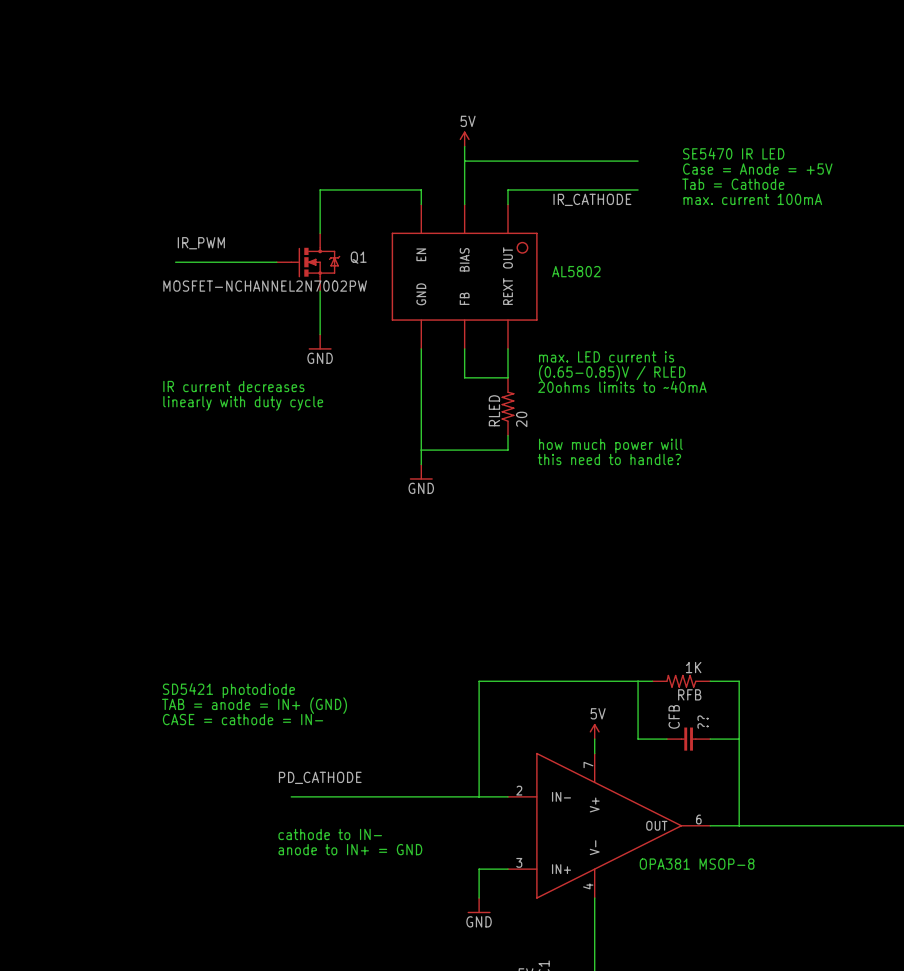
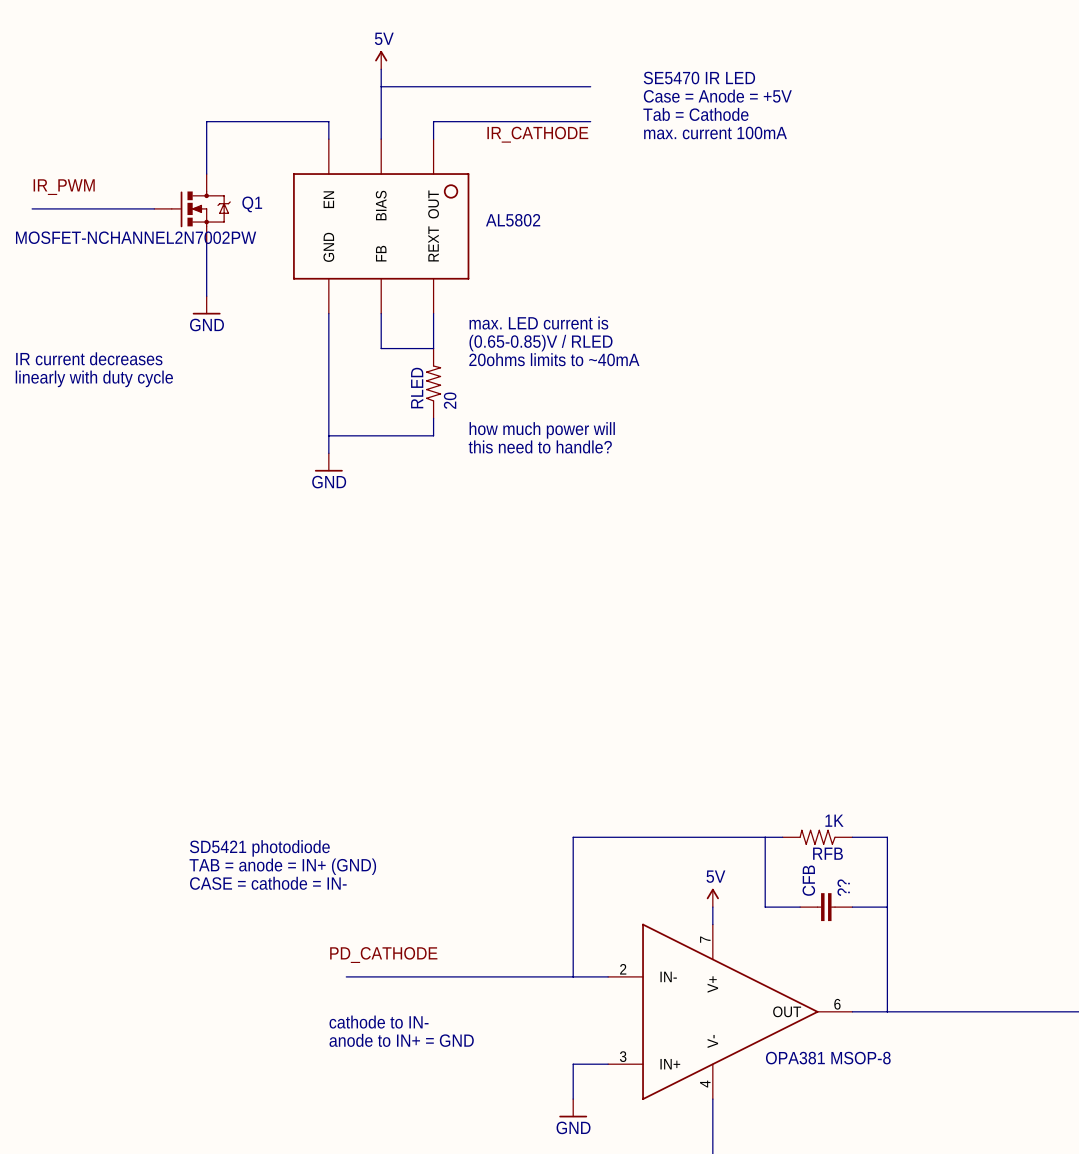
power symbol: none -> 5V (381, 60)
wire: none -> (381, 69) (381, 139)
text: none -> SE5470 IR LED (699, 78)
wire: none -> (381, 86) (590, 86)
text: none -> Case = Anode = +5V (717, 96)
text: none -> Tab = Cathode (695, 114)
wire: none -> (590, 121) (433, 121) (433, 139)
label: none -> IR_CATHODE (537, 134)
text: none -> max. current 100mA (715, 133)
wire: none -> (328, 139) (328, 121) (206, 121) (206, 174)
power symbol: 5V (464, 139) -> none
label: none -> IR_PWM (64, 187)
wire: (464, 146) (464, 204) -> none
text: SE5470 IR LED (733, 153) -> none
wire: none -> (32, 208) (154, 208)
wire: (464, 161) (638, 161) -> none
text: Case = Anode = +5V (757, 169) -> none
text: none -> AL5802 (513, 220)
part: none -> (381, 226)
text: Tab = Cathode (733, 184) -> none
wire: none -> (206, 243) (206, 296)
wire: (638, 189) (508, 189) (508, 204) -> none
label: IR_CATHODE (592, 199) -> none
text: max. current 100mA (752, 199) -> none
wire: (421, 204) (421, 189) (320, 189) (320, 233) -> none
power symbol: none -> GND (206, 305)
label: IR_PWM (201, 243) -> none
wire: none -> (328, 313) (328, 453)
wire: none -> (381, 313) (381, 348) (433, 348) (433, 313)
text: none -> max. LED current is (538, 323)
wire: (175, 262) (276, 262) -> none
Q1 position: (308, 262) -> (192, 208)
text: AL5802 (576, 271) -> none
text: none -> (0.65-0.85)V / RLED (541, 343)
part: (464, 276) -> none
text: none -> IR current decreases (89, 358)
text: none -> 20ohms limits to ~40mA (554, 359)
wire: (320, 291) (320, 334) -> none
text: none -> linearly with duty cycle (94, 378)
RLED: none -> 20 (433, 383)
wire: none -> (433, 418) (433, 435) (328, 435)
power symbol position: GND (320, 342) -> GND (328, 462)
text: none -> how much power will (542, 430)
wire: (421, 348) (421, 464) -> none
wire: (464, 348) (464, 377) (508, 377) (508, 348) -> none
text: max. LED current is (606, 356) -> none
text: none -> this need to handle? (540, 446)
text: (0.65-0.85)V / RLED (612, 373) -> none
text: IR current decreases (233, 386) -> none
text: 20ohms limits to ~40mA (622, 386) -> none
text: linearly with duty cycle (243, 403) -> none
RLED: 20 (508, 406) -> none
wire: (508, 435) (508, 450) (421, 450) -> none
text: how much power will (610, 445) -> none
text: this need to handle? (609, 459) -> none
power symbol: GND (421, 472) -> none

